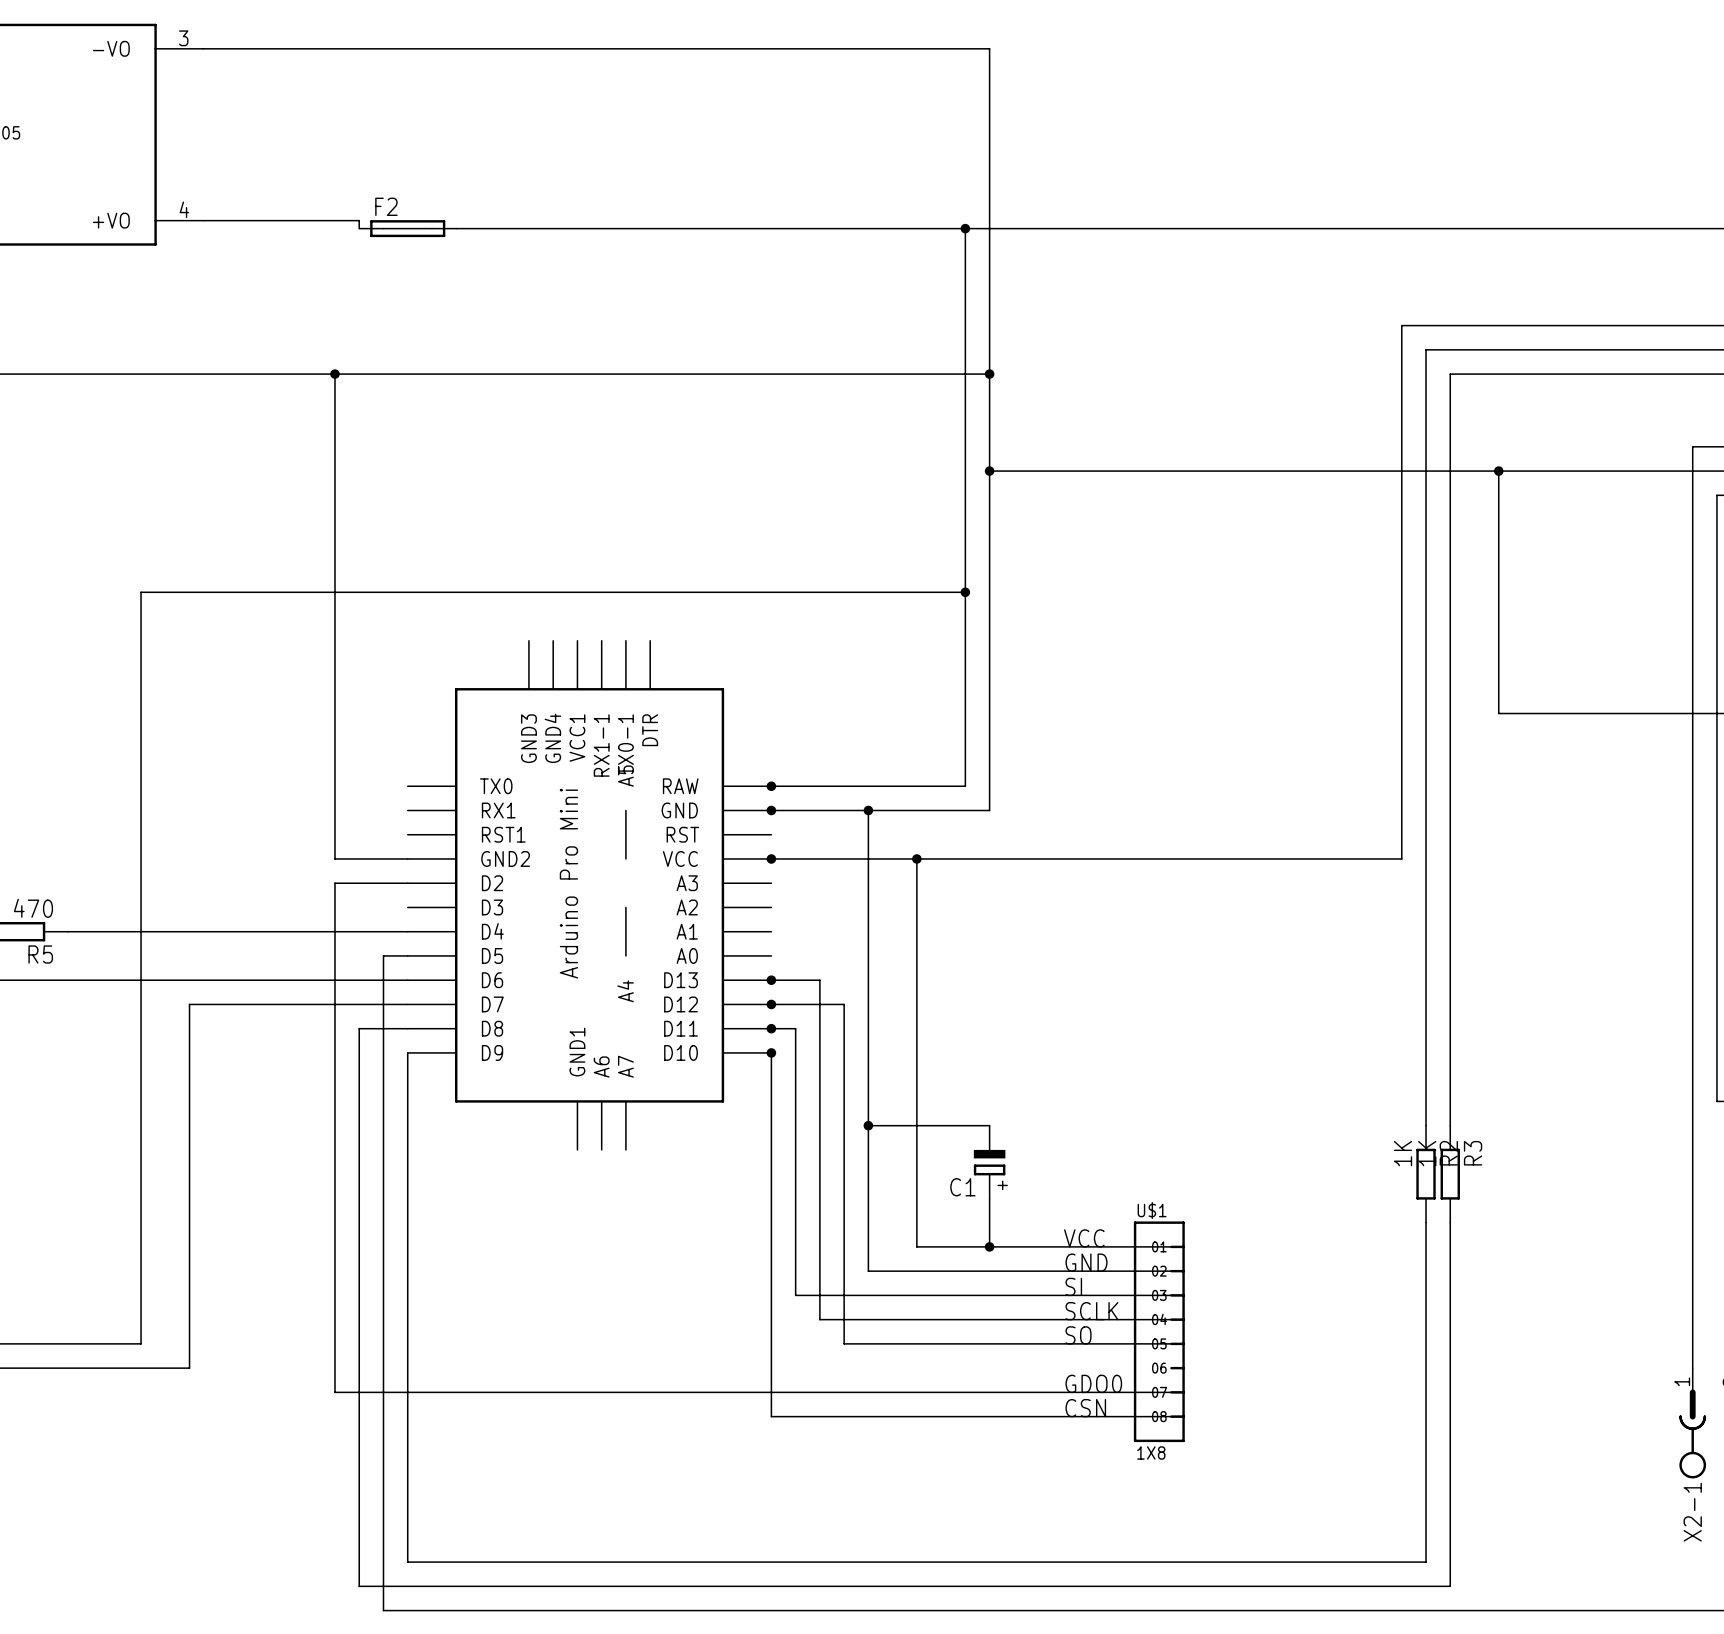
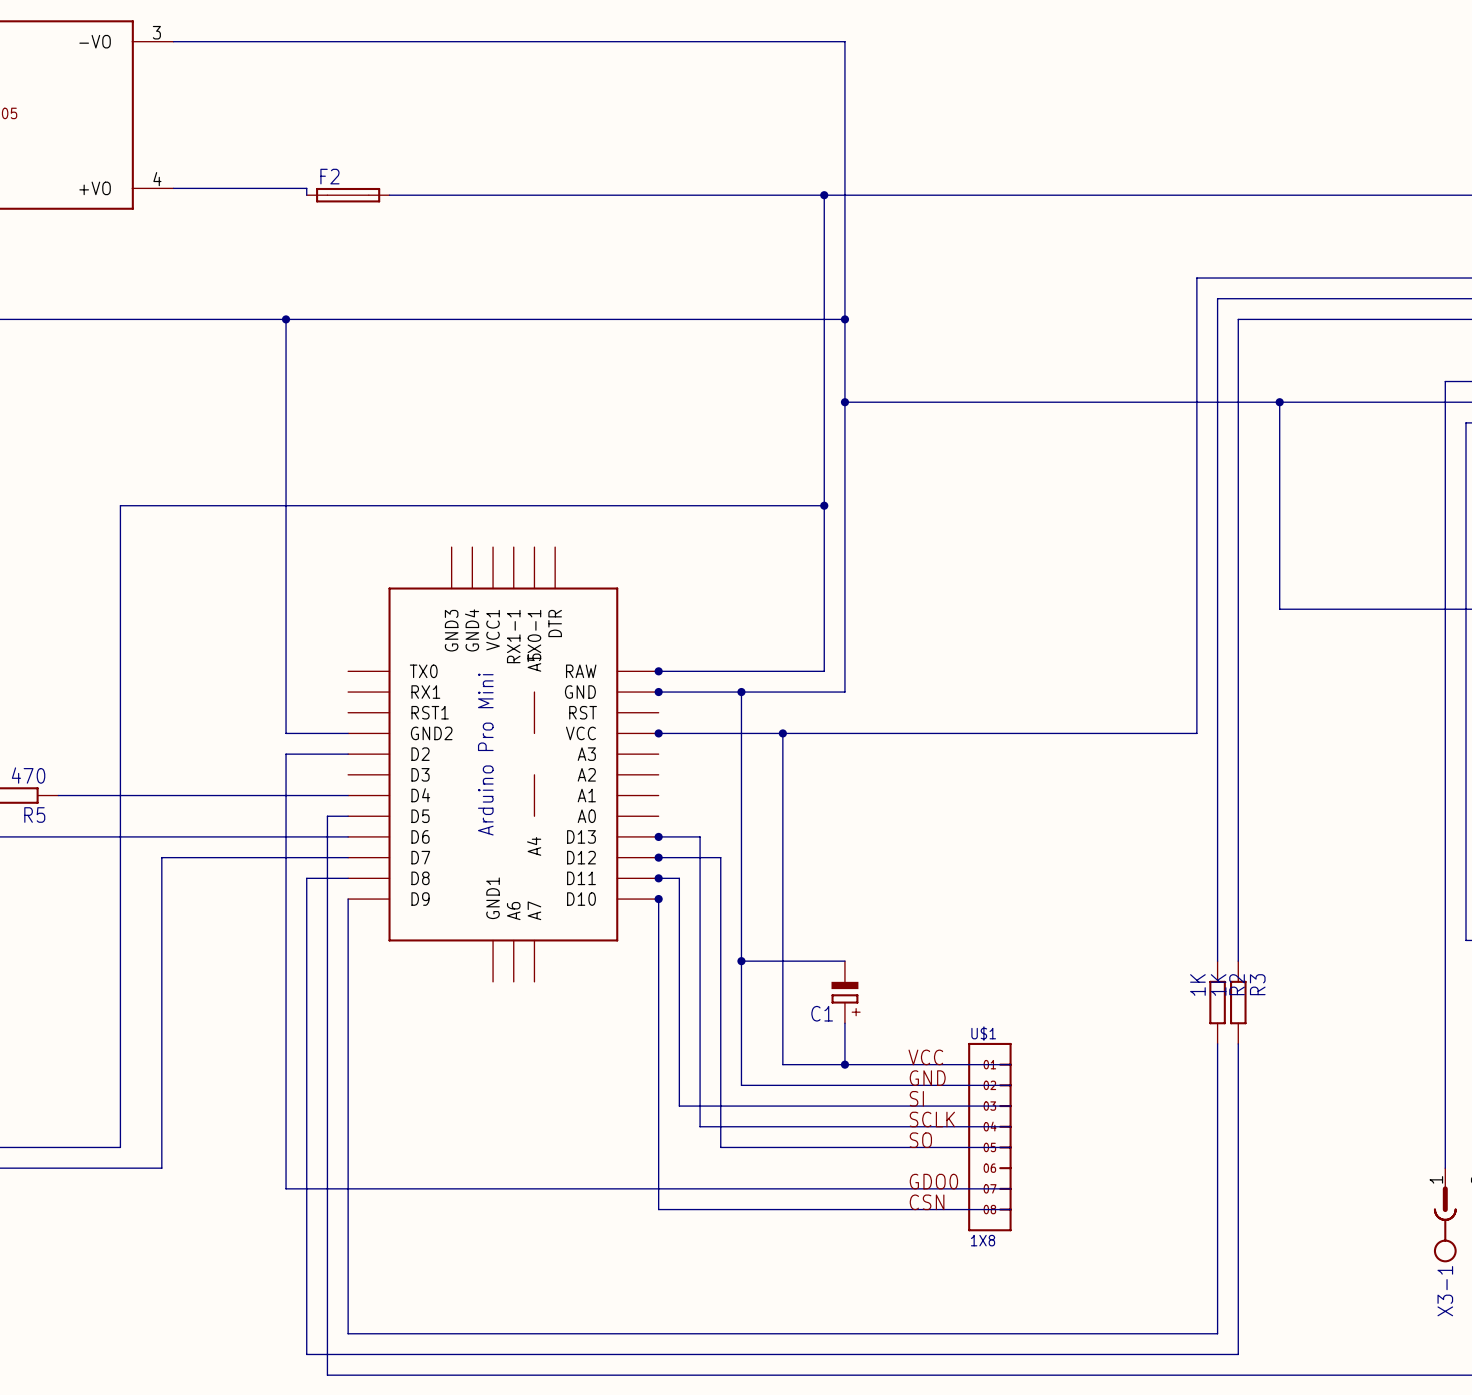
X2-1 name: X2-1 (1692, 1512) -> X3-1 (1445, 1291)

